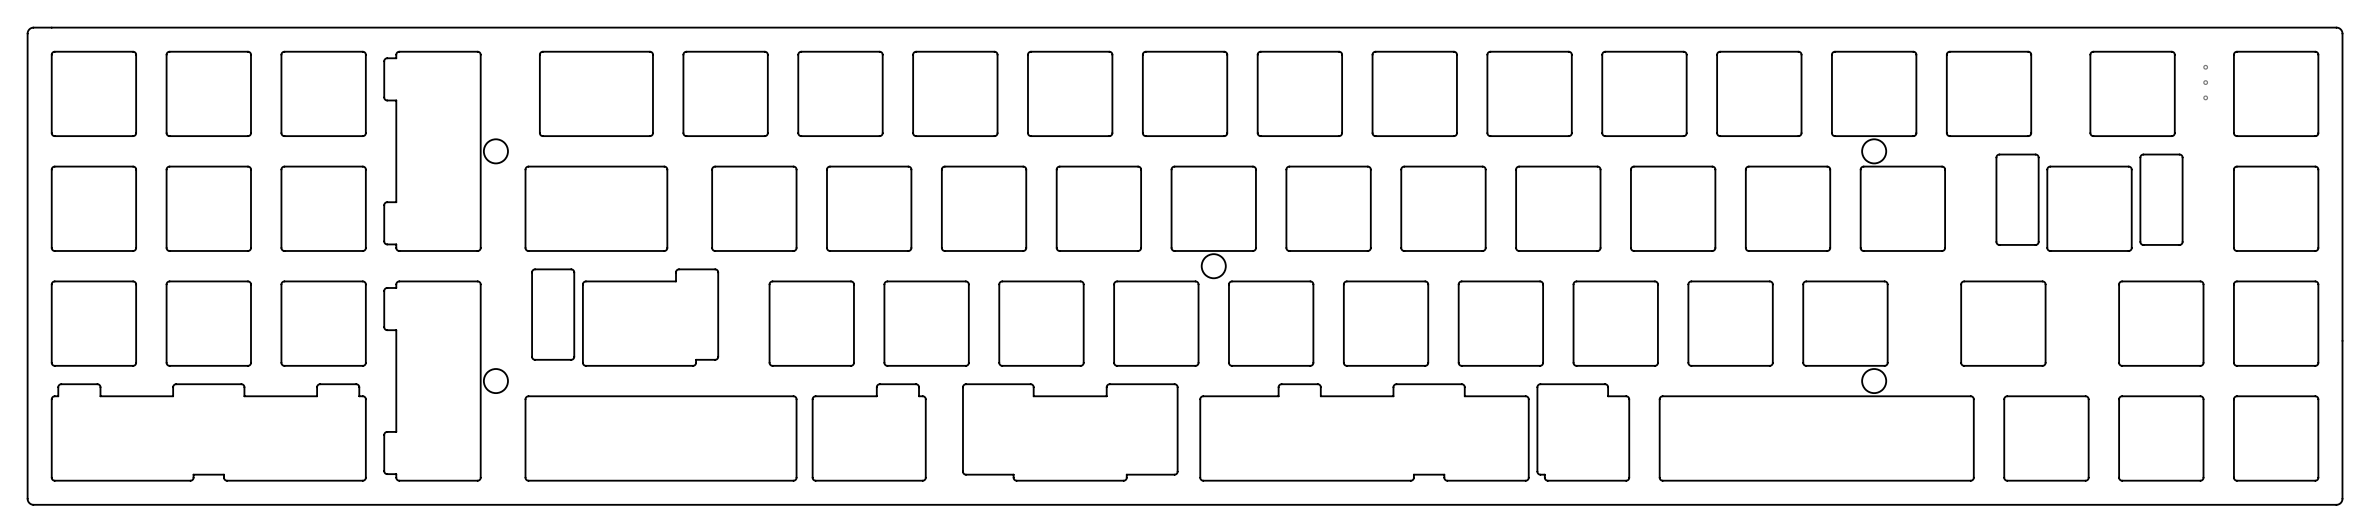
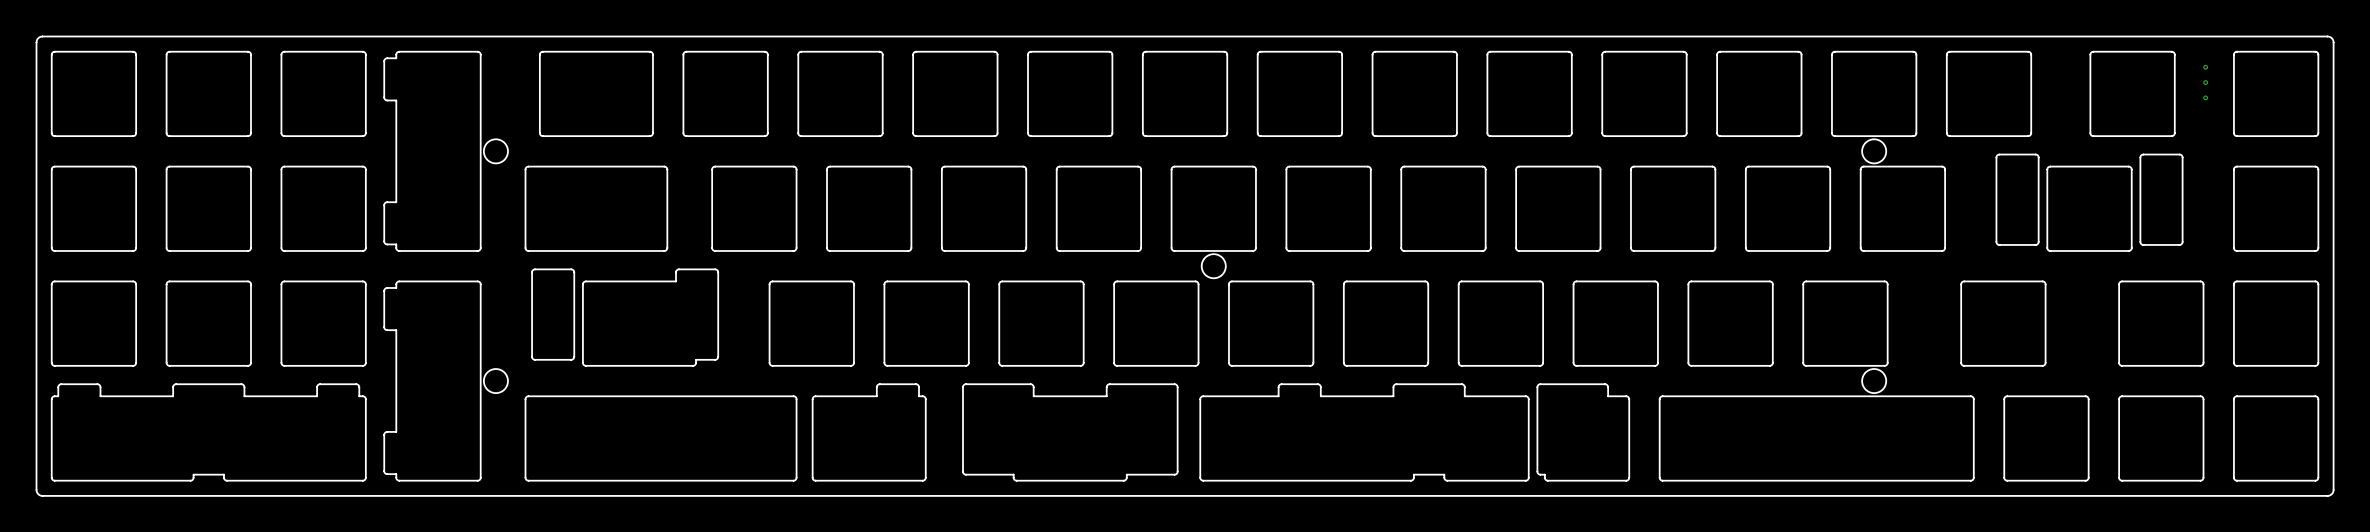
board edge: (33, 27) (2337, 27) (2342, 33) (2342, 500) (2336, 504) (32, 504) (27, 498) (27, 33) (29, 29) (33, 27) -> (42, 36) (38, 38) (36, 42) (36, 489) (41, 495) (2327, 495) (2333, 491) (2333, 42) (2328, 36) (42, 36)

